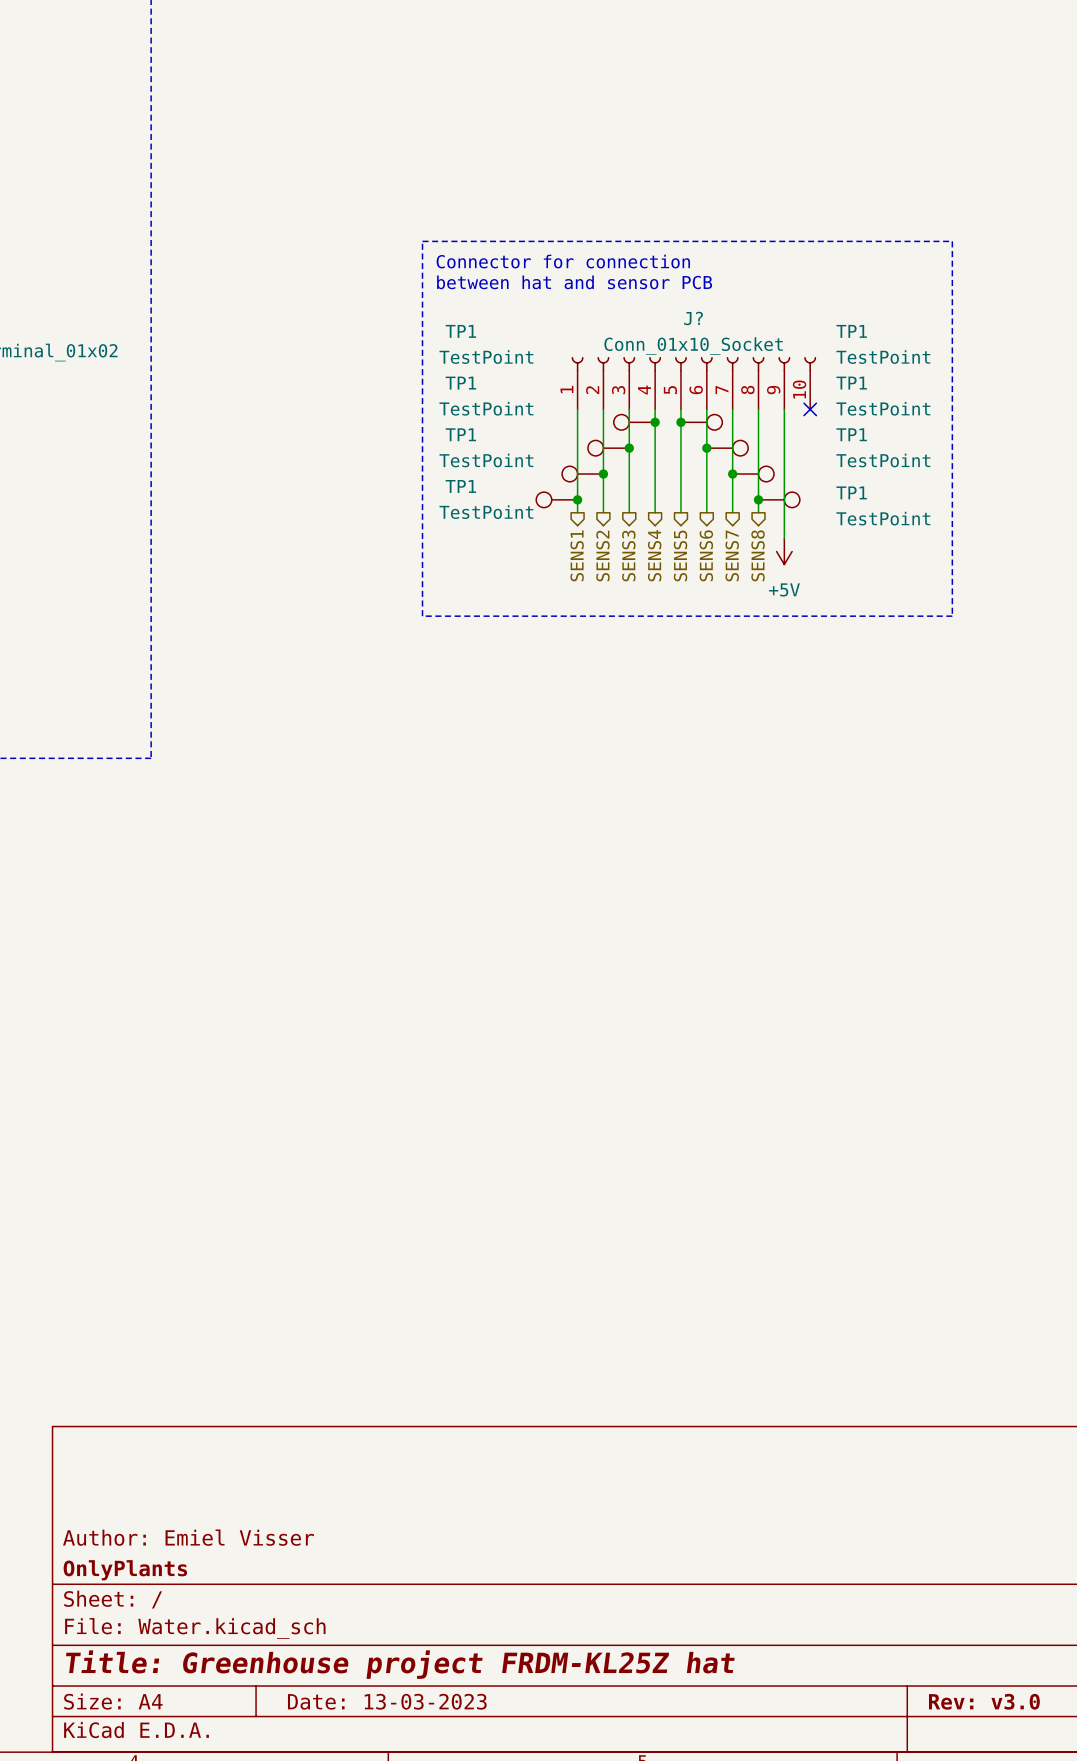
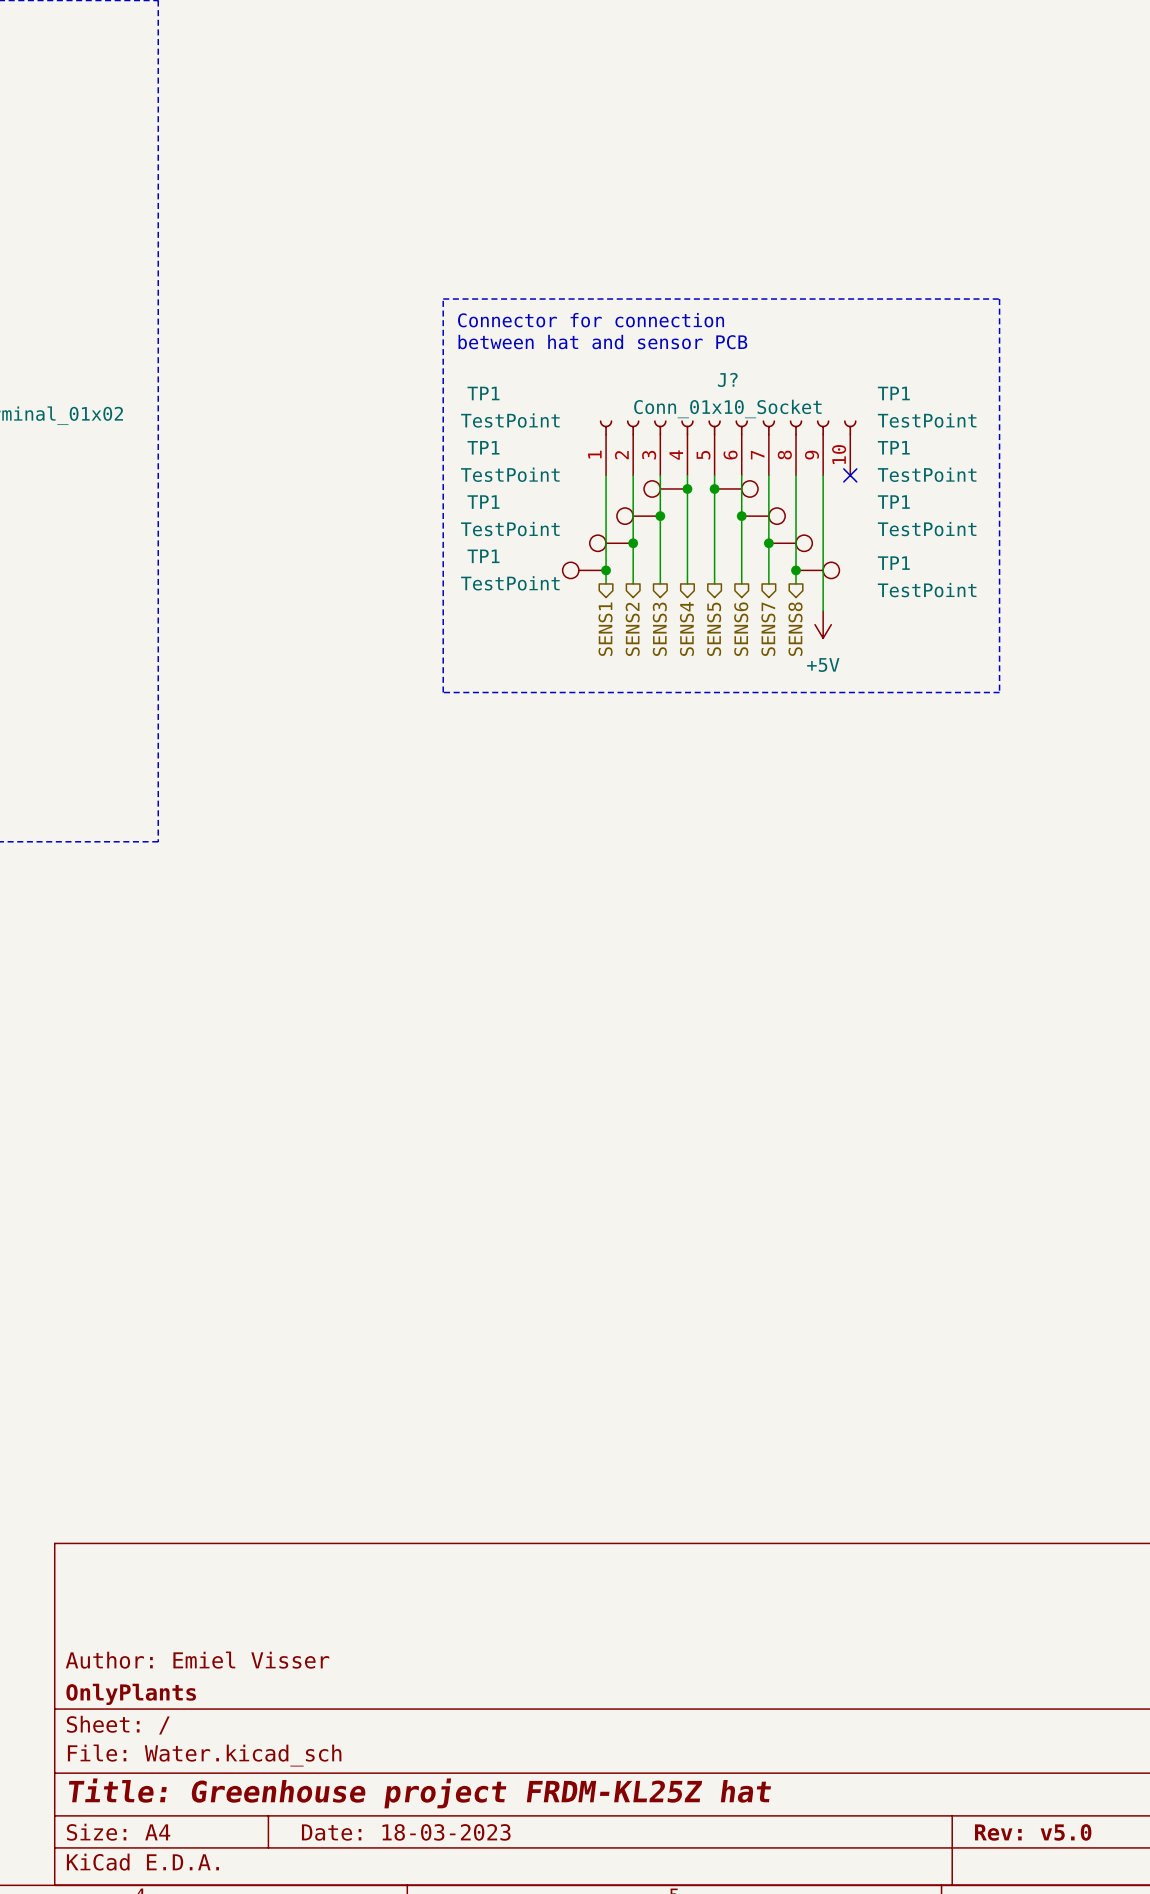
title block: Date: 13-03-2023 (387, 1701) -> Date: 18-03-2023 (406, 1832)
title block: Rev: v3.0 (984, 1701) -> Rev: v5.0 (1033, 1832)

